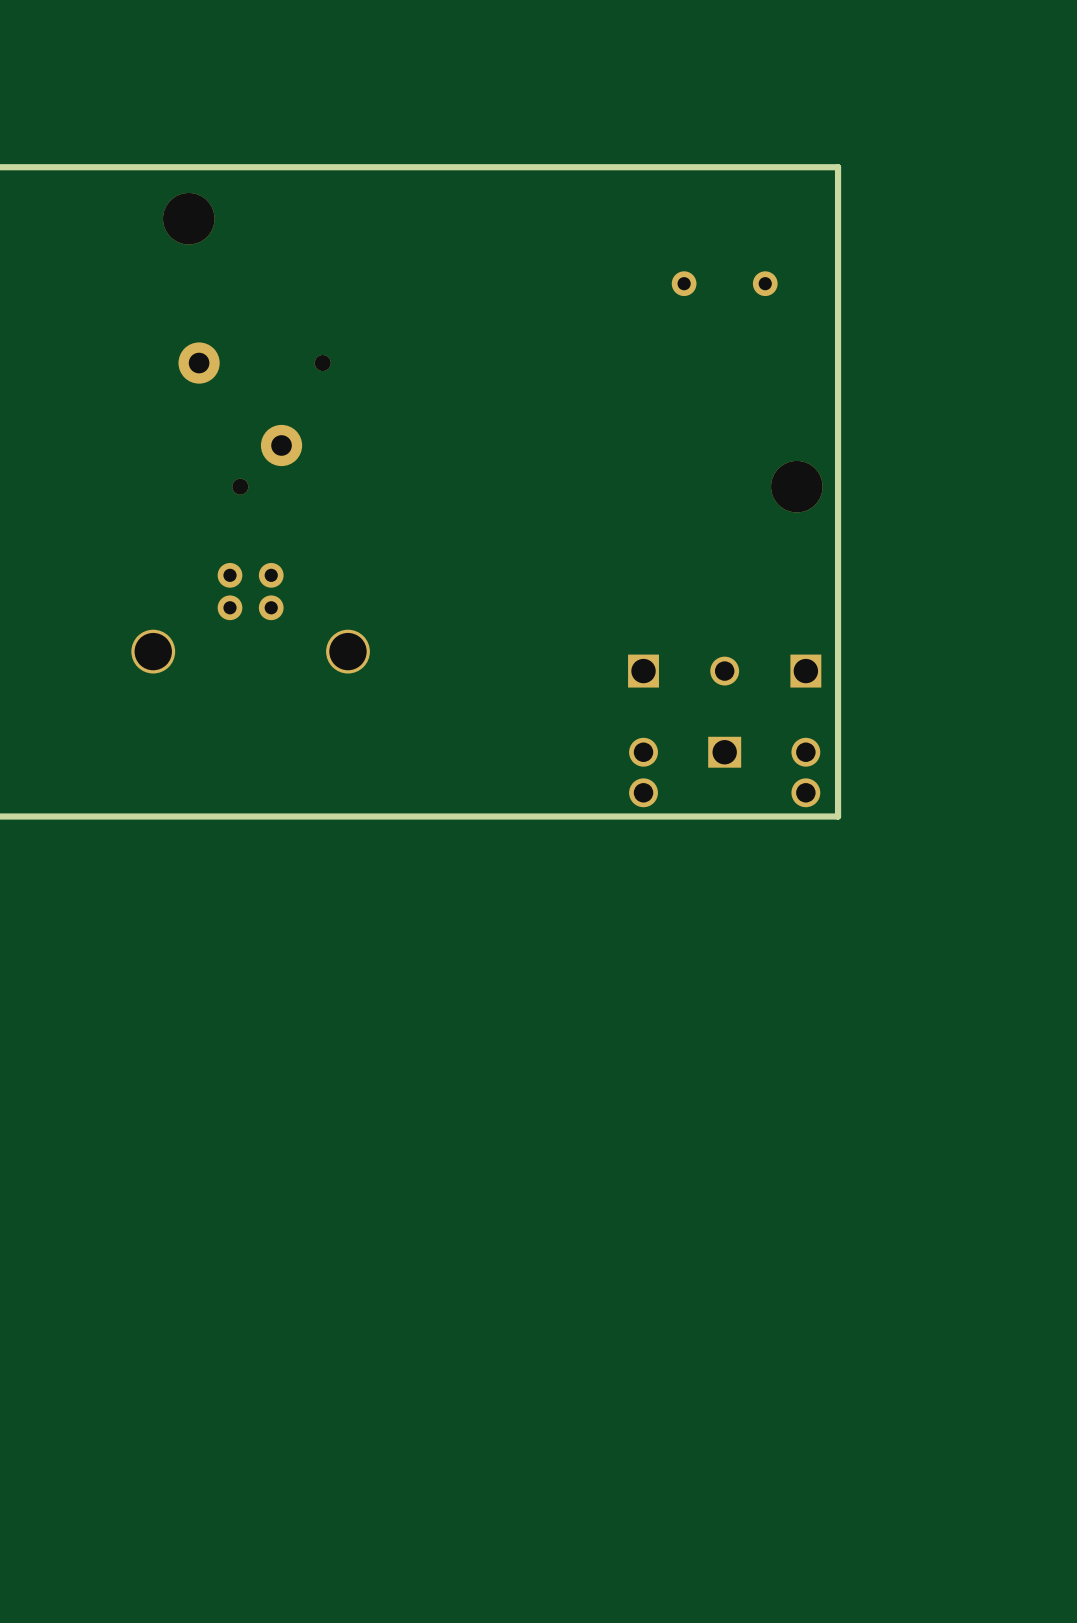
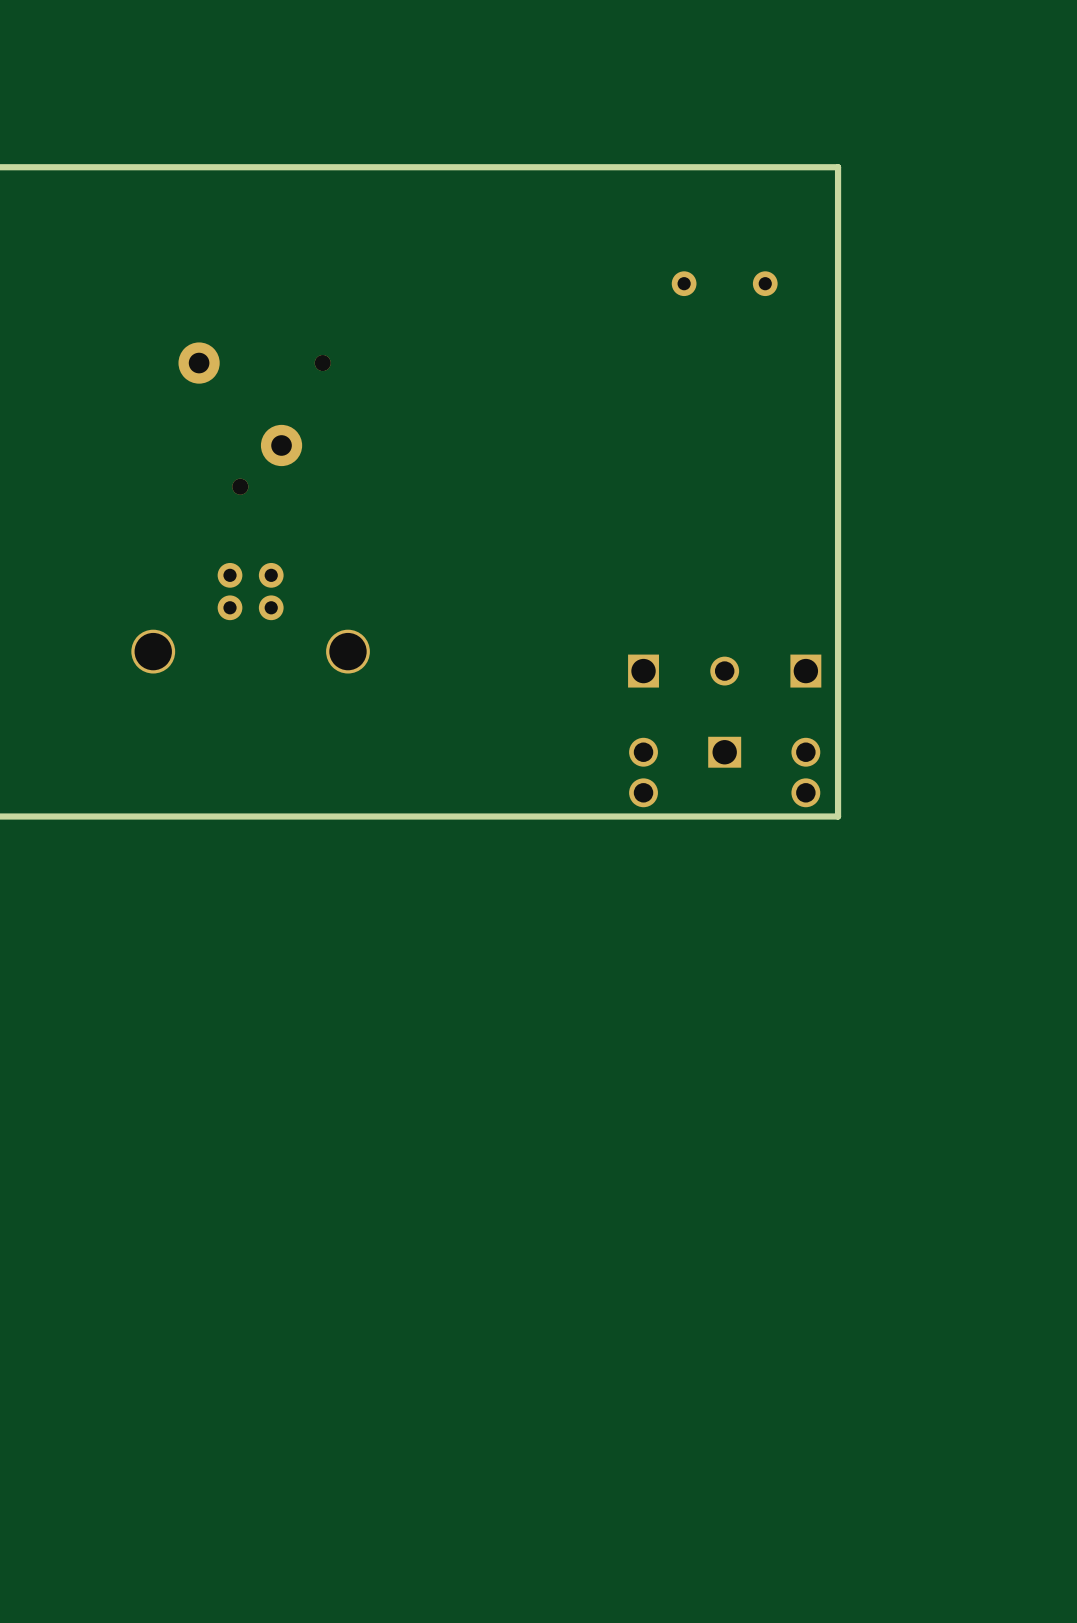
part: (188, 218) -> none
part: (796, 486) -> none

